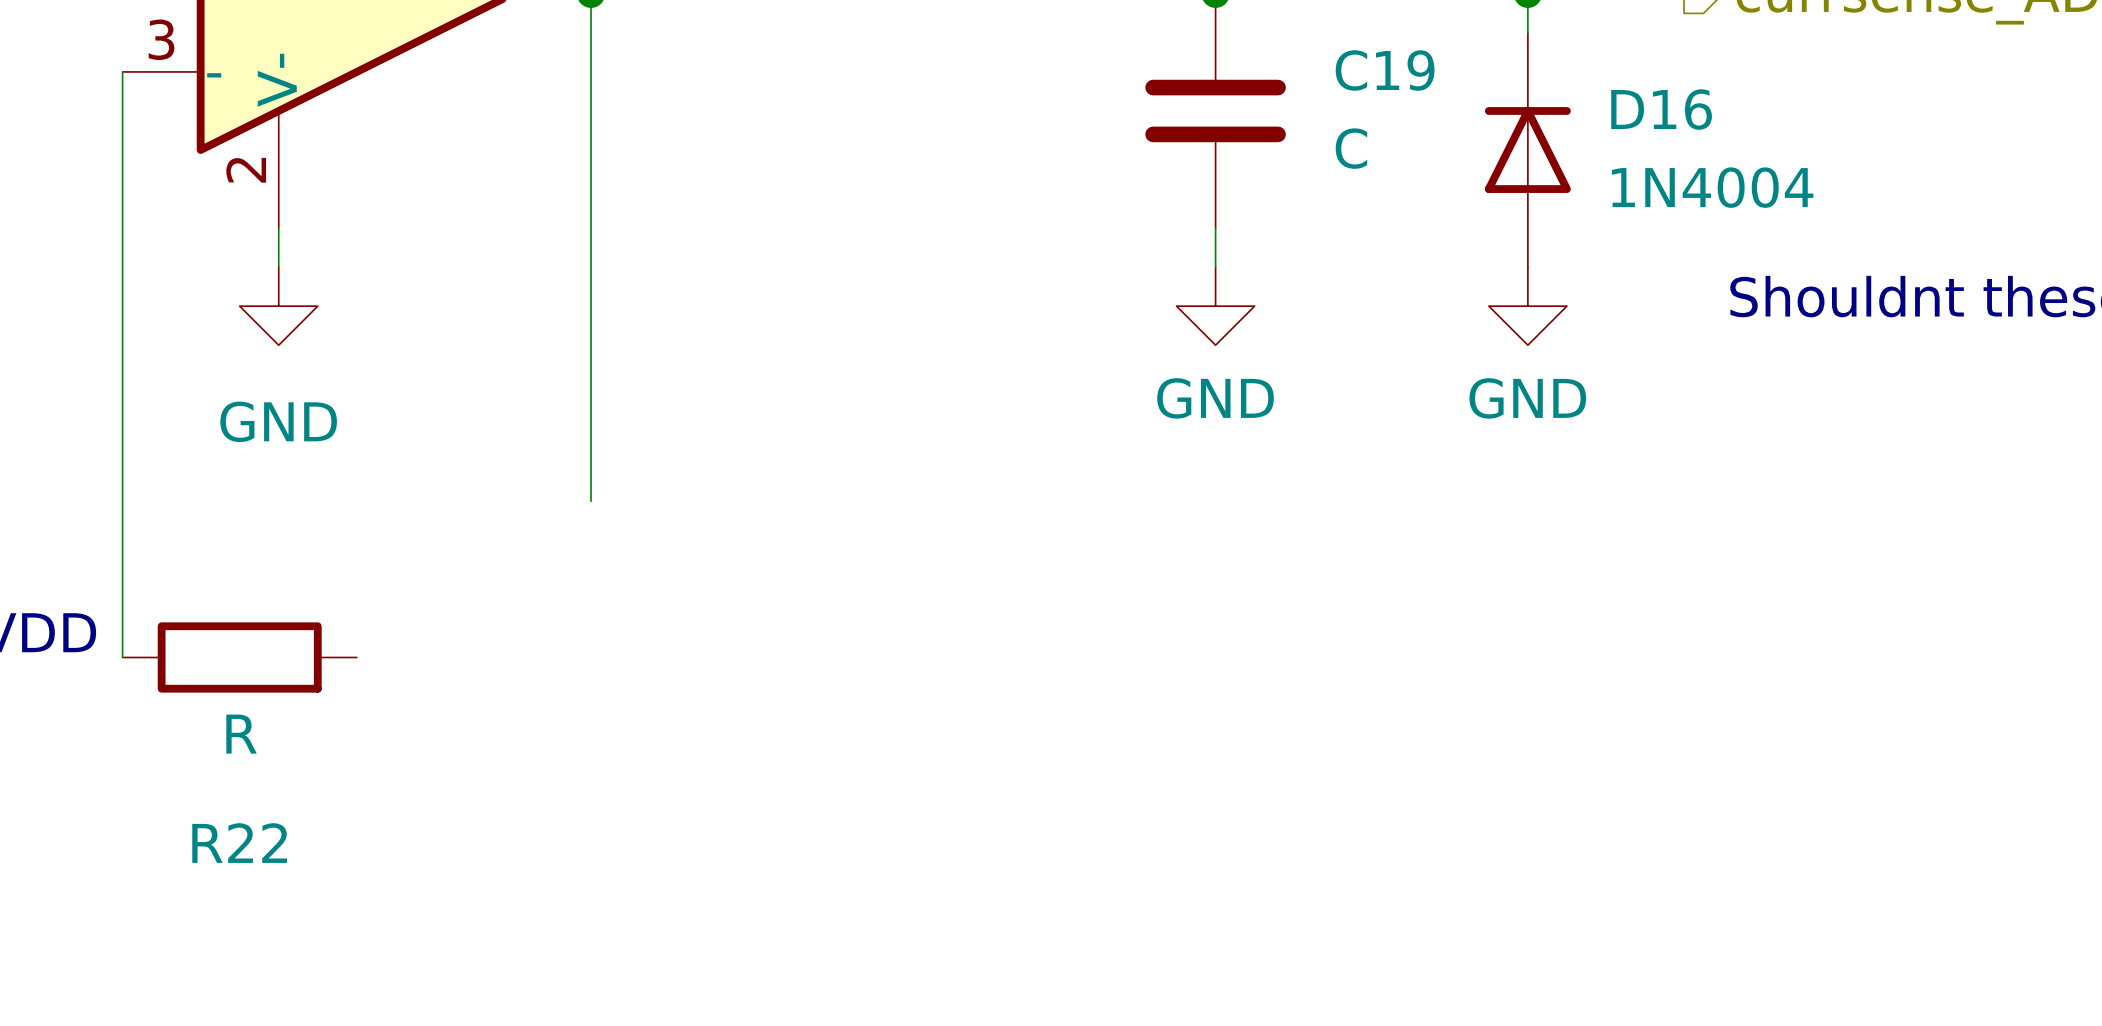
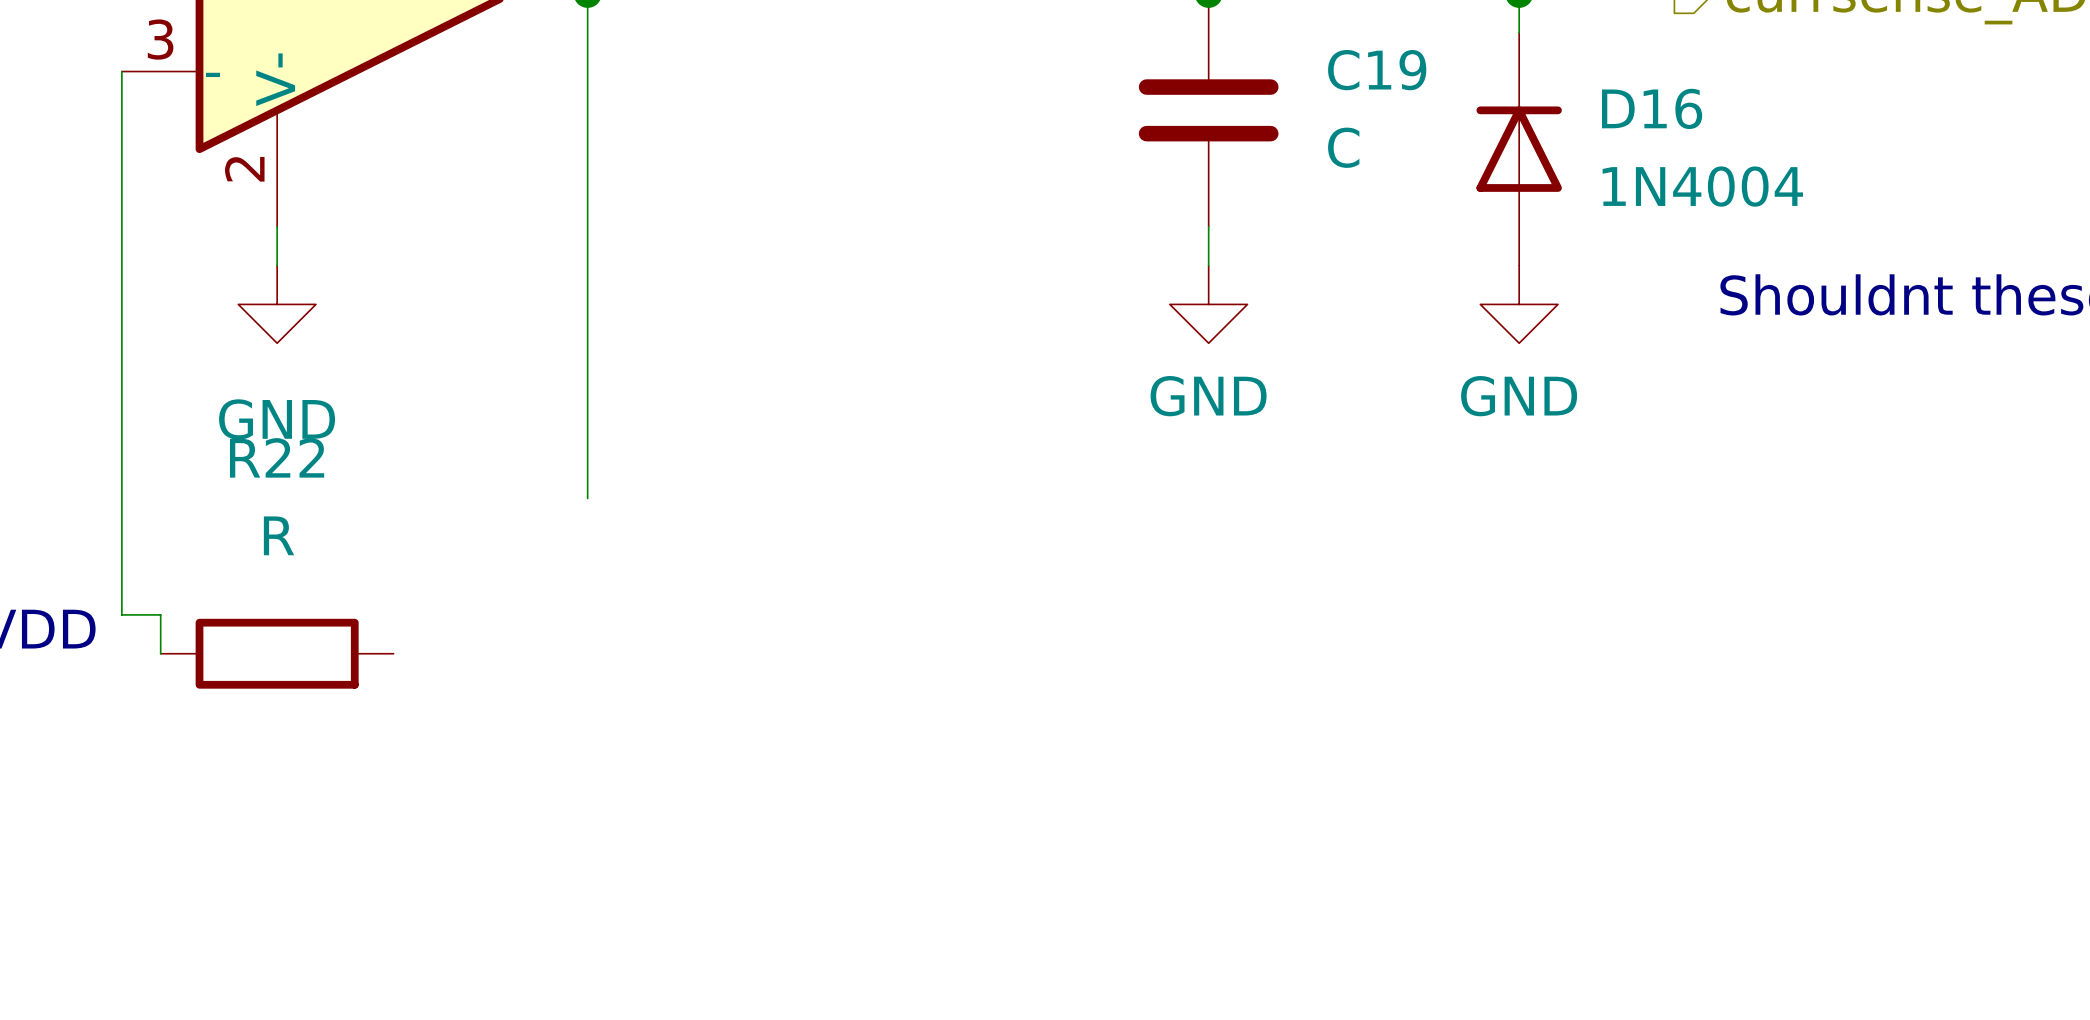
wire: (122, 618) (122, 657) -> (121, 614) (160, 614) (160, 653)
R22 position: (239, 657) -> (277, 653)
R22 value position: R (241, 734) -> R (278, 535)
R22 name position: R22 (239, 843) -> R22 (277, 457)

